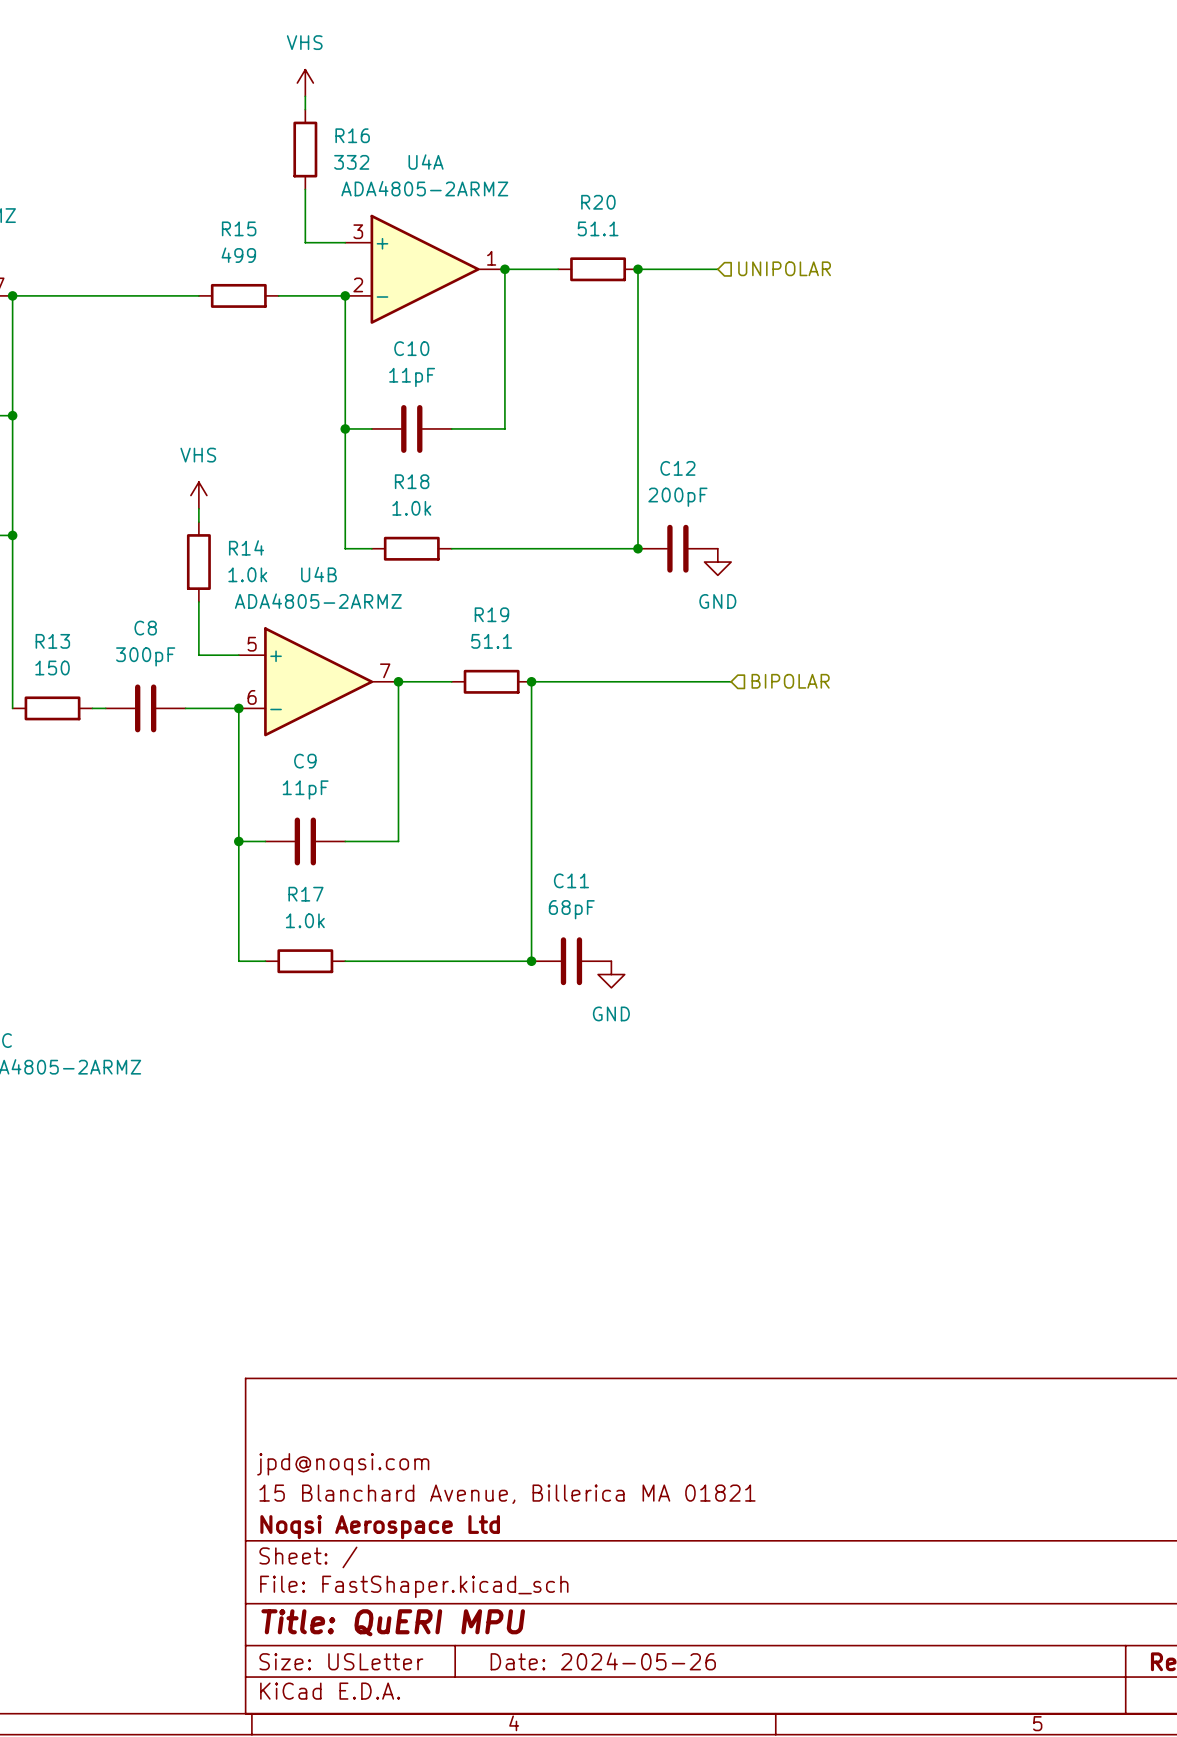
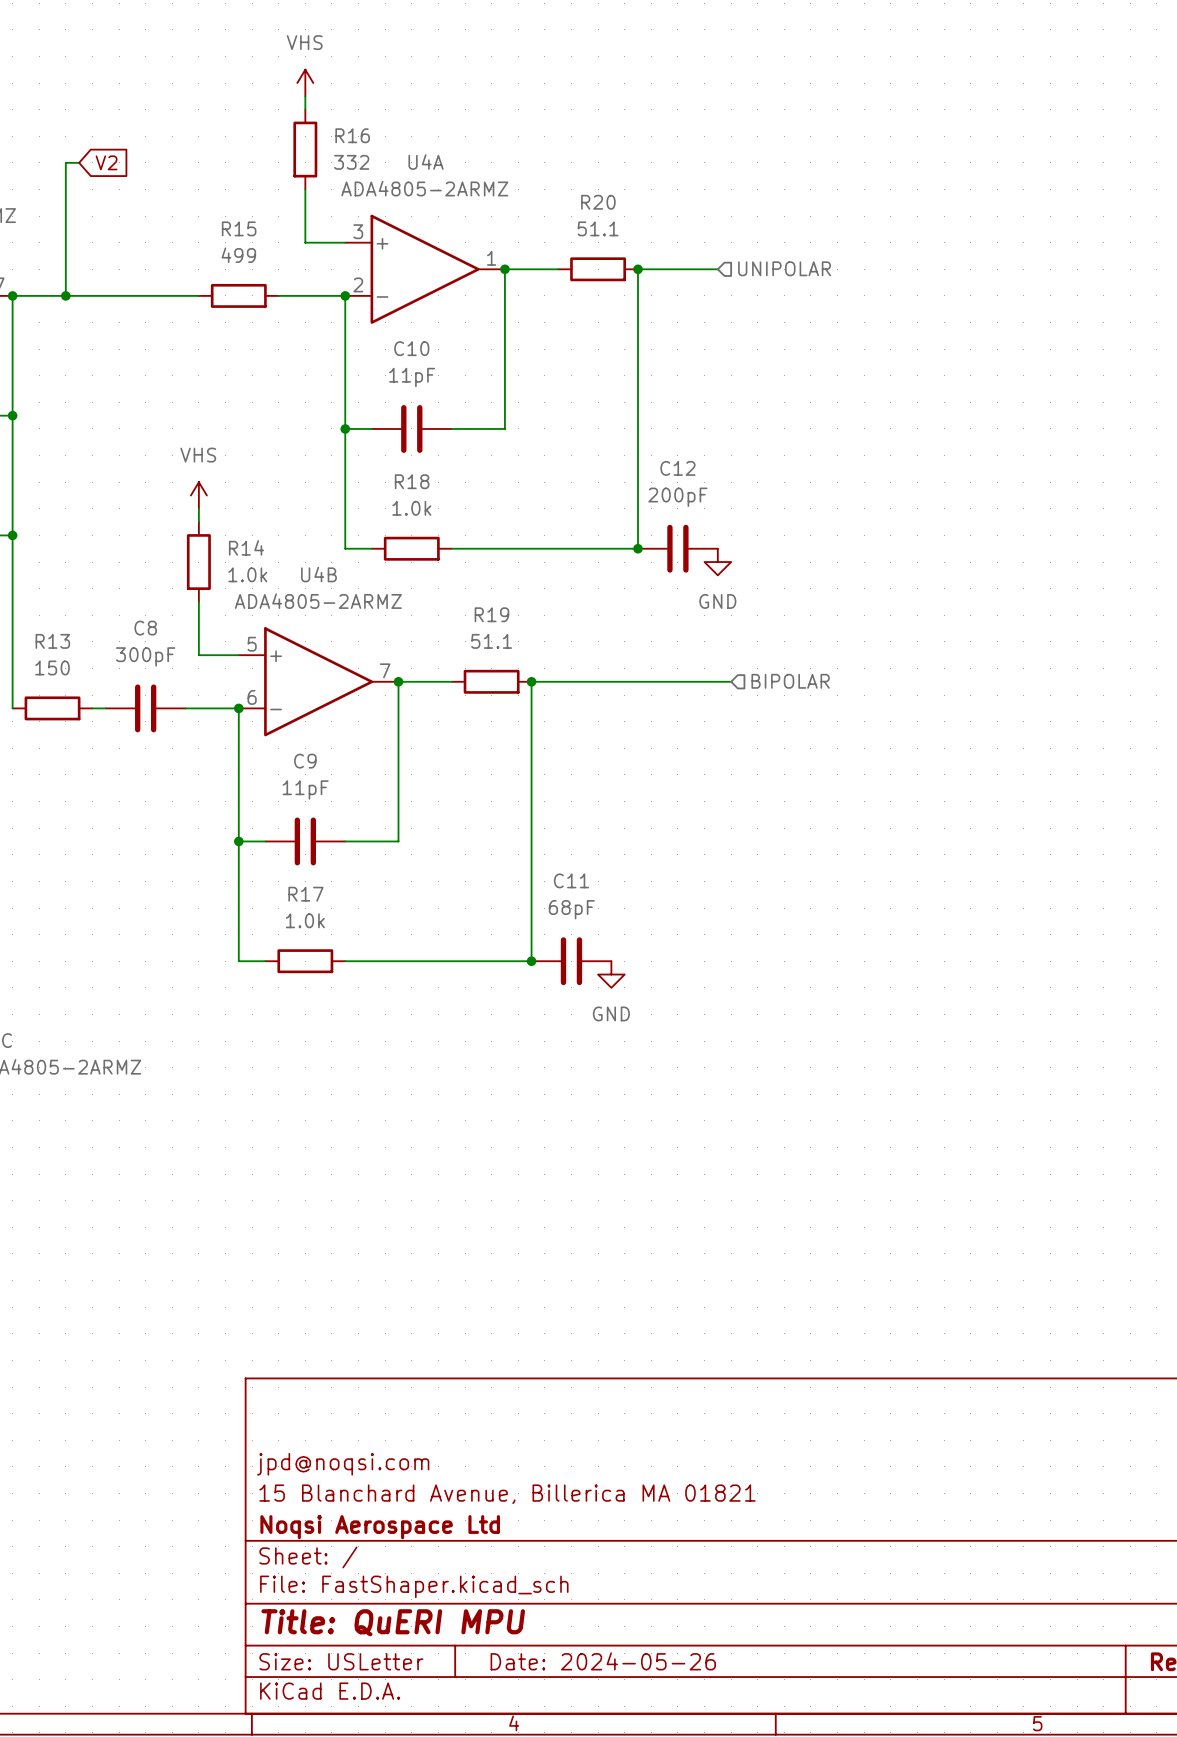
wire: none -> (79, 162) (65, 162) (65, 295)
global label: none -> V2 (106, 162)
junction: none -> (65, 295)

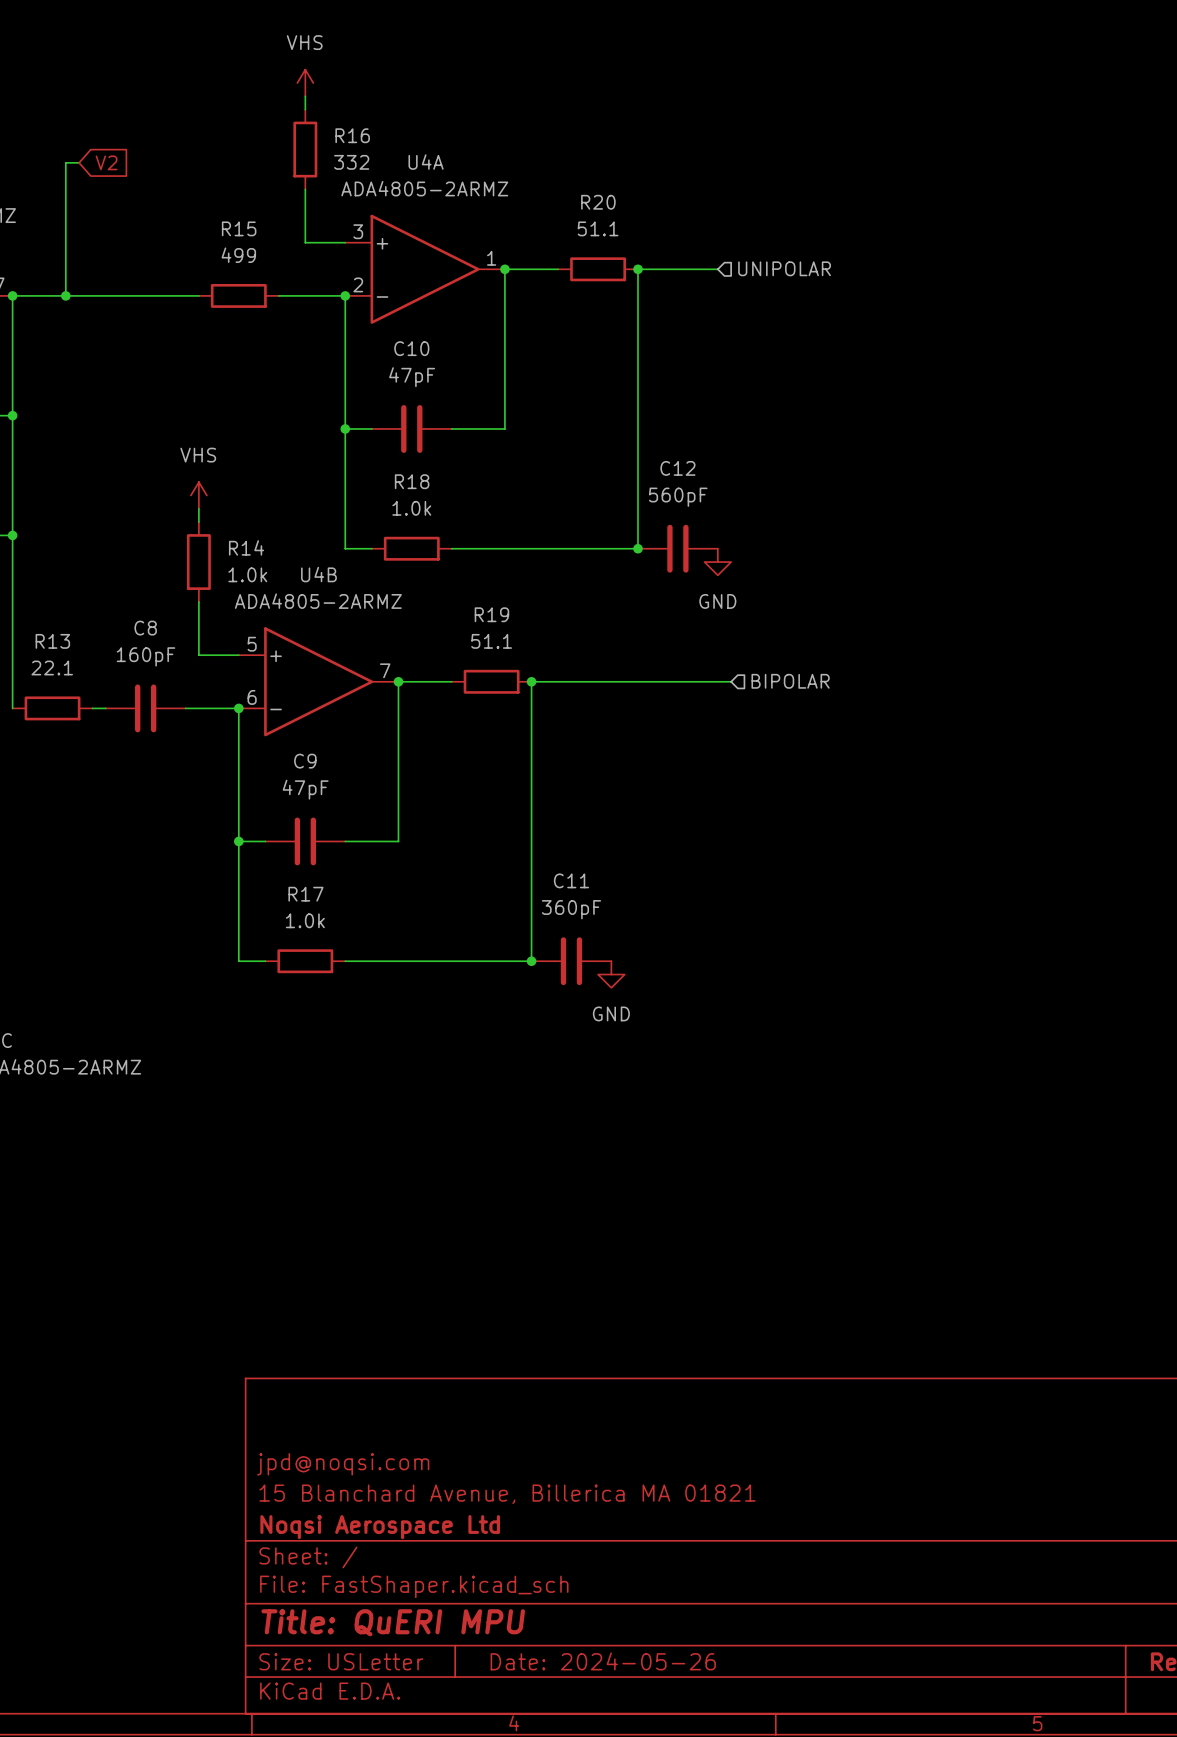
C10 value: 11pF (412, 377) -> 47pF (412, 377)
C12 value: 200pF (677, 497) -> 560pF (678, 497)
C8 value: 300pF (145, 656) -> 160pF (145, 656)
R13 value: 150 (52, 667) -> 22.1 (52, 667)
C9 value: 11pF (305, 789) -> 47pF (305, 789)
C11 value: 68pF (571, 909) -> 360pF (571, 909)

